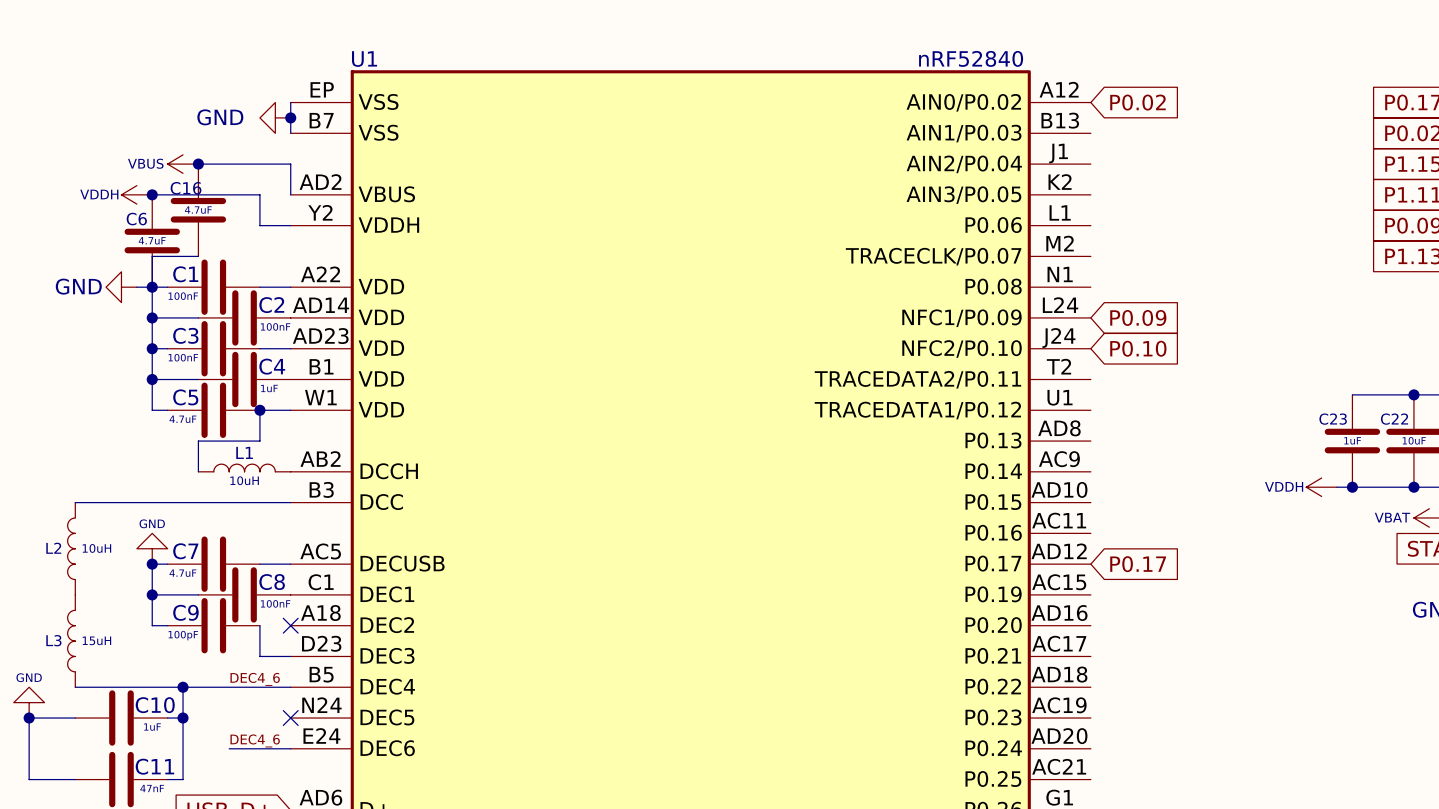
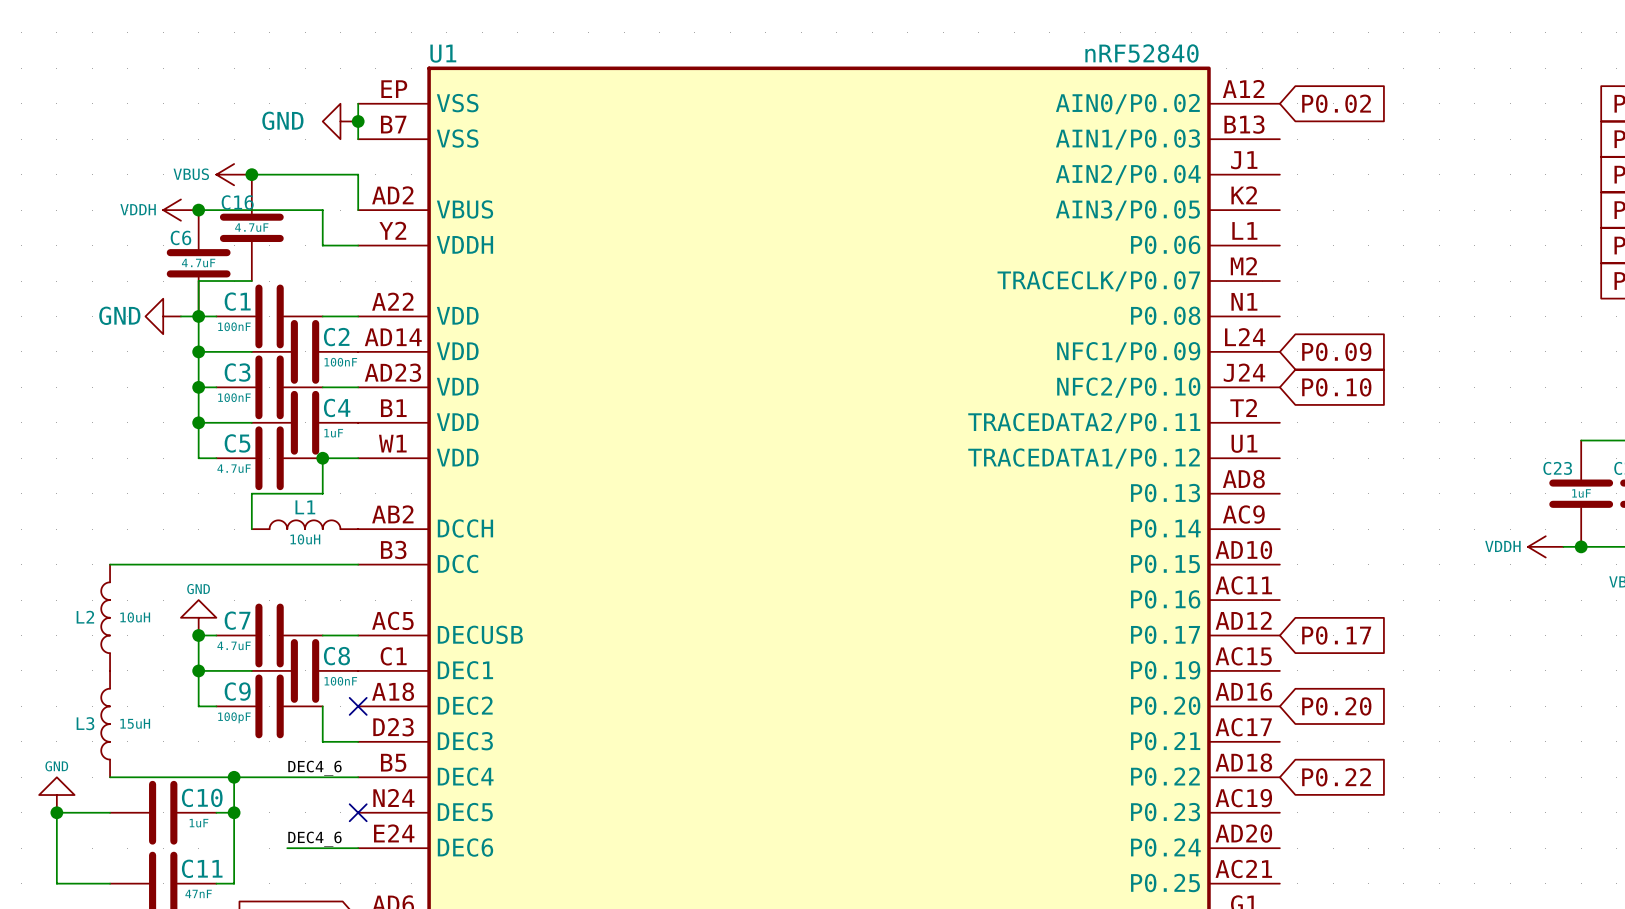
global label: none -> P0.20 (1336, 706)
global label: none -> P0.22 (1336, 777)

